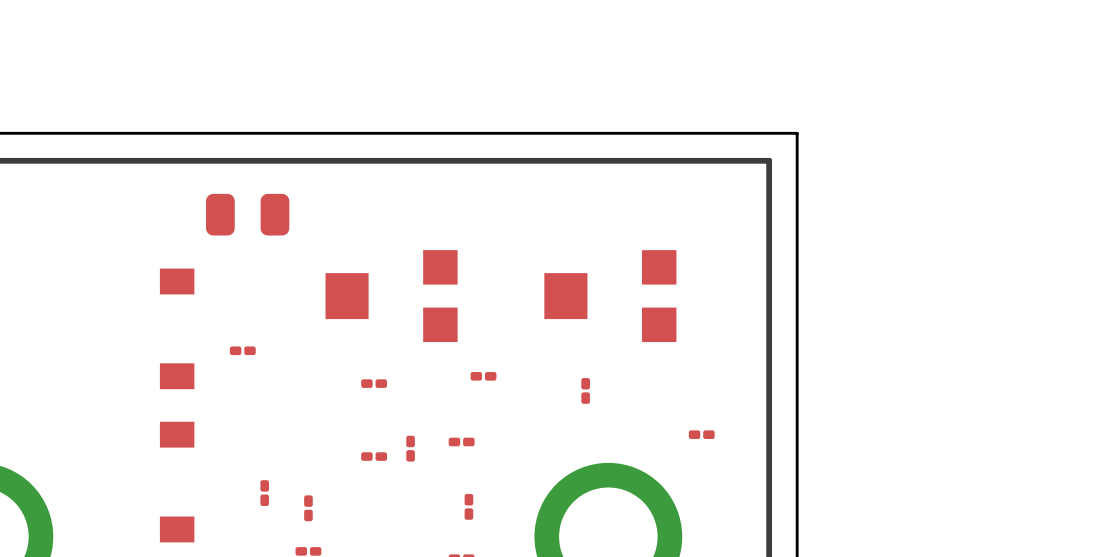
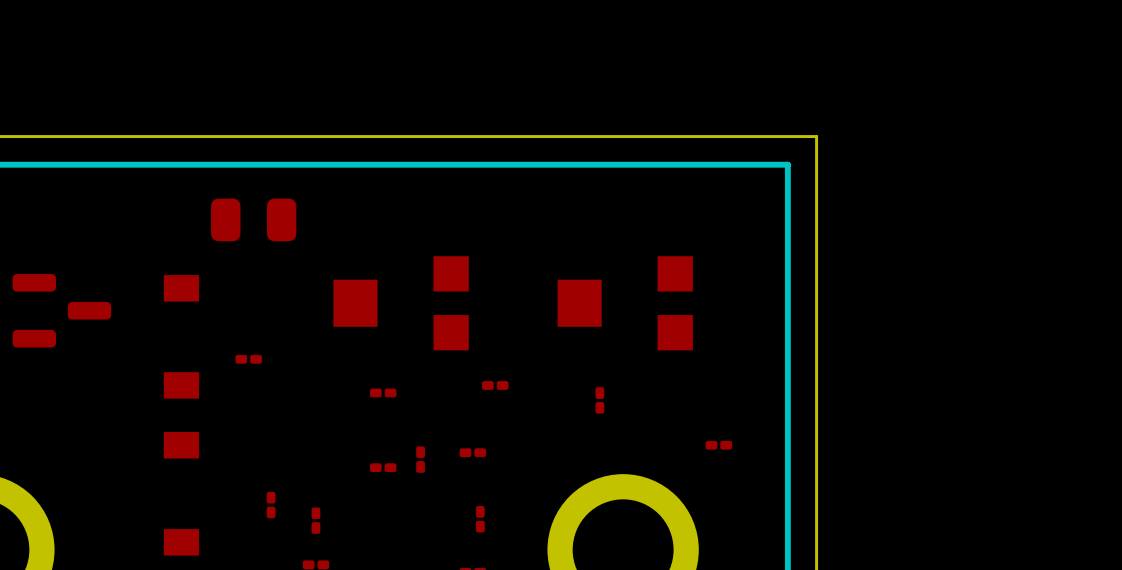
part: none -> (61, 310)

